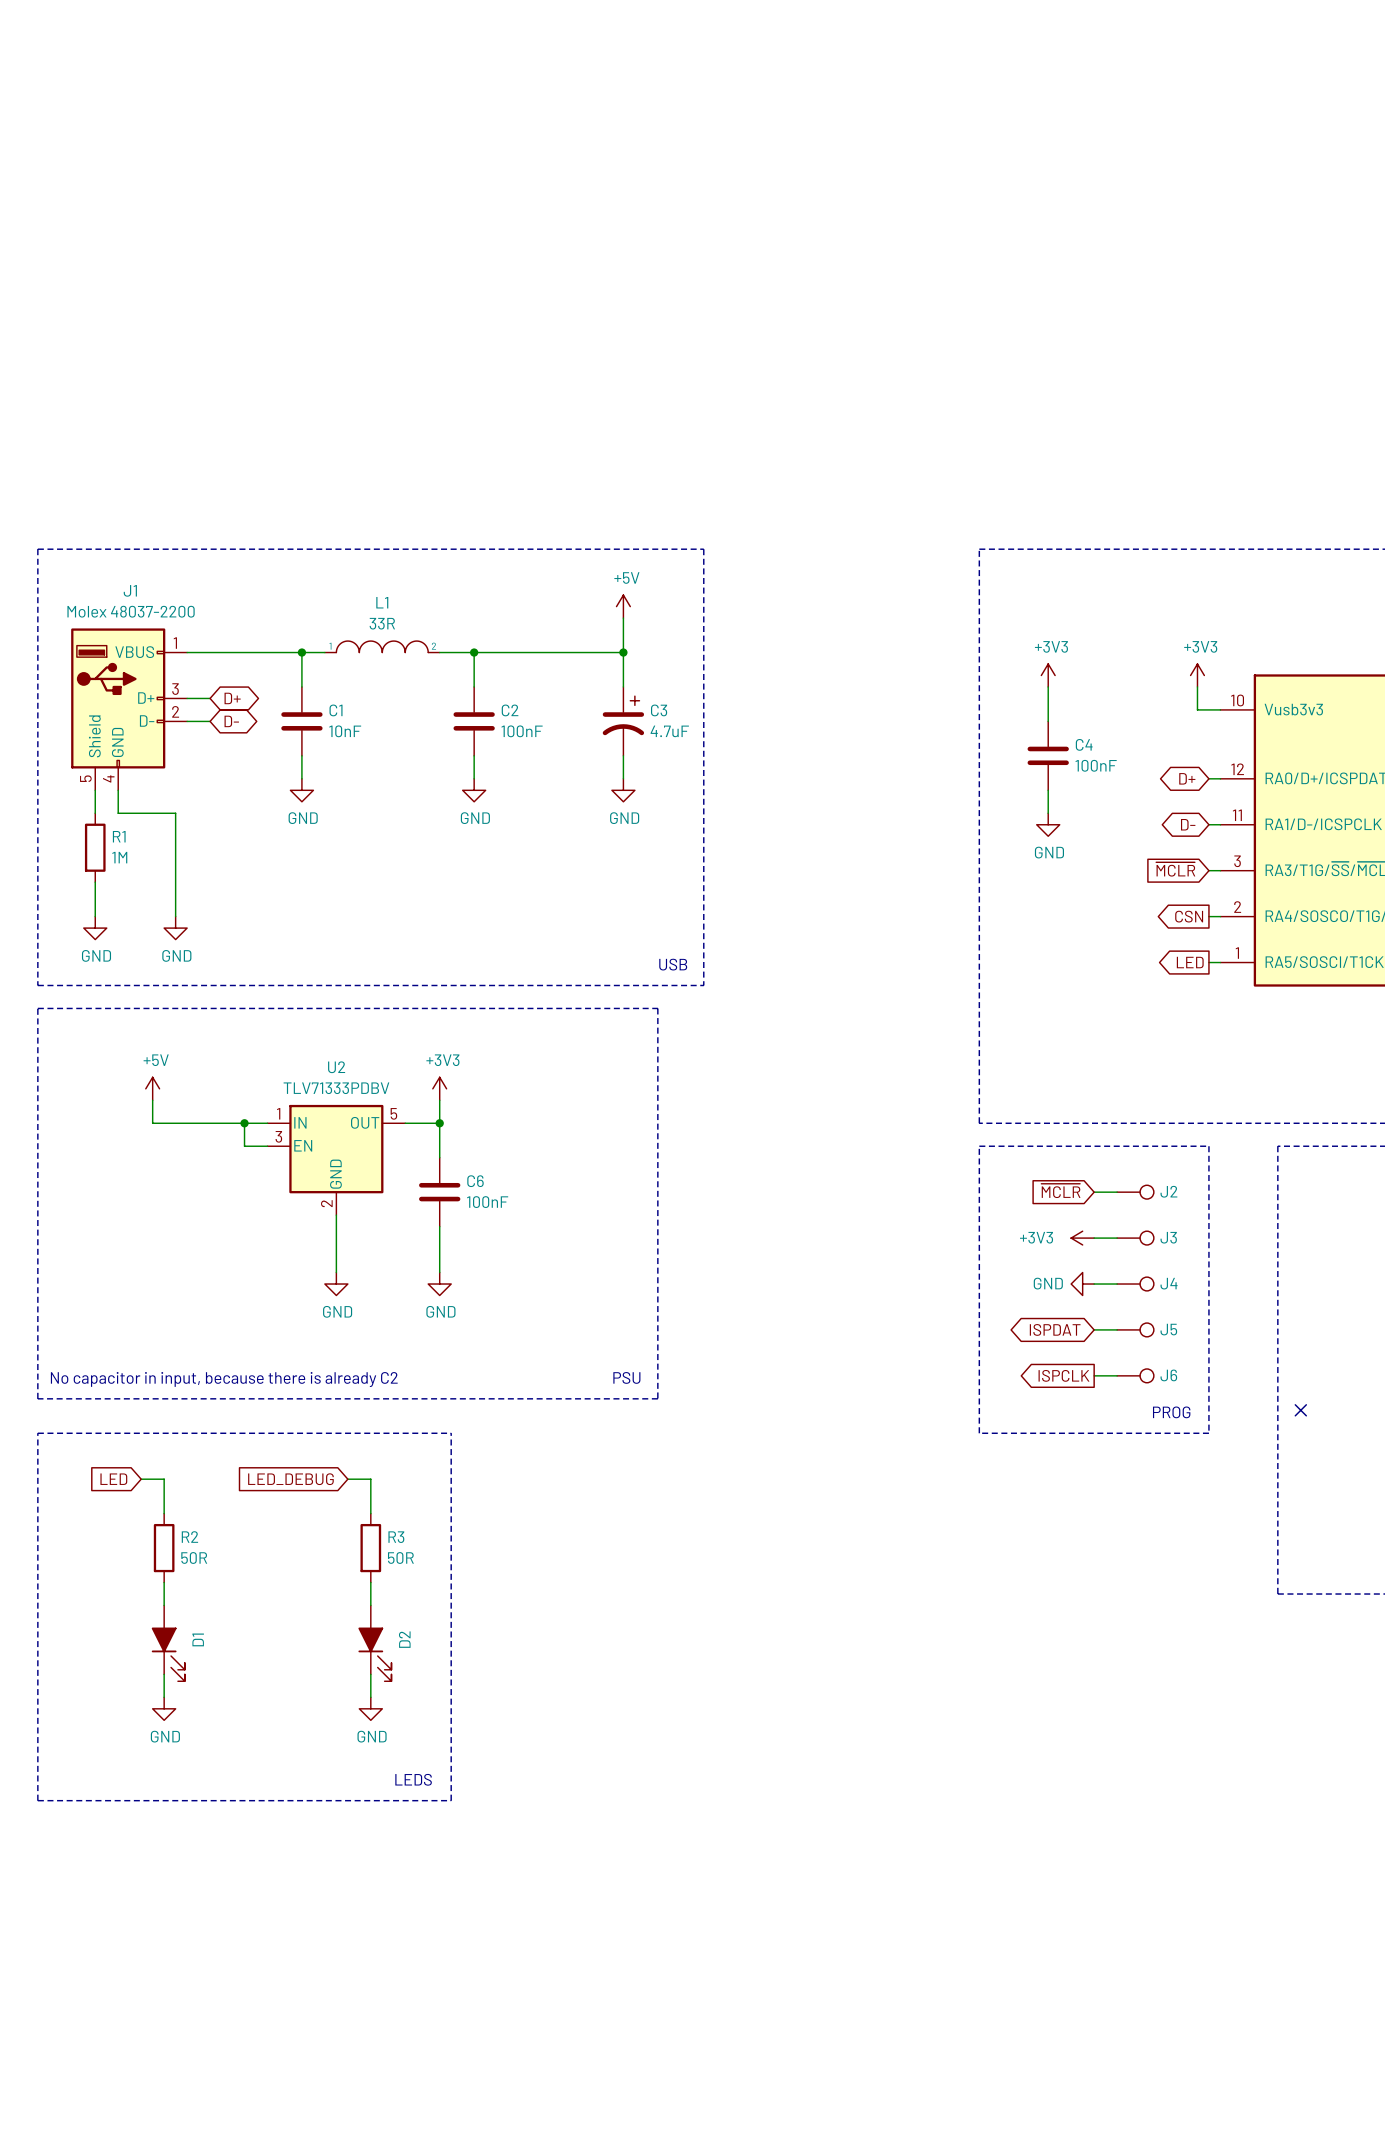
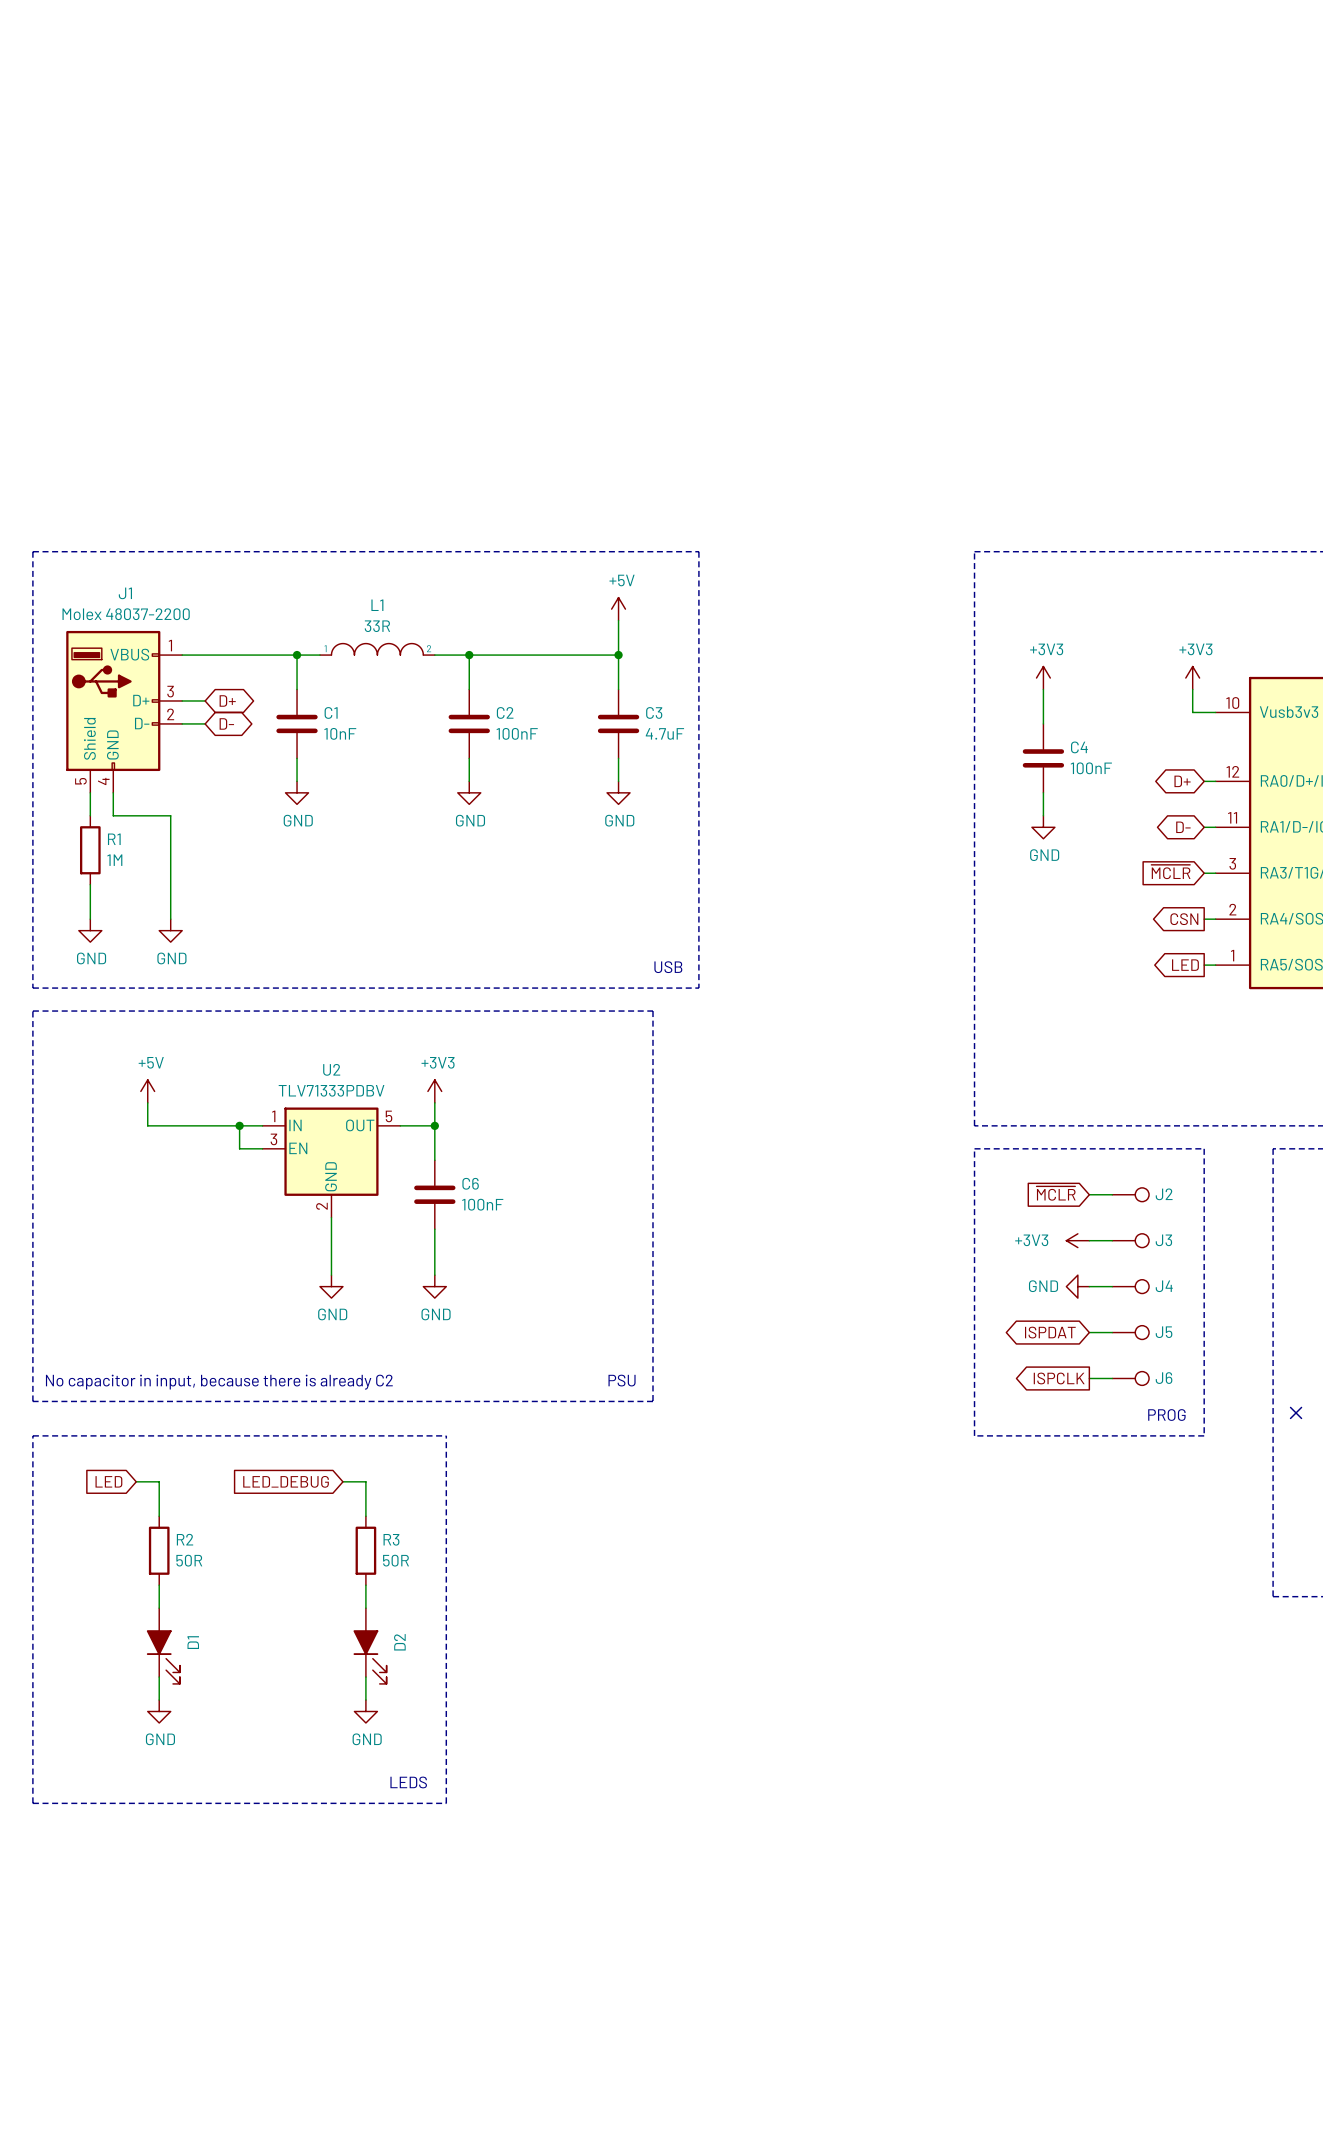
C3 symbol: [602, 686, 645, 756] -> [597, 689, 640, 759]

